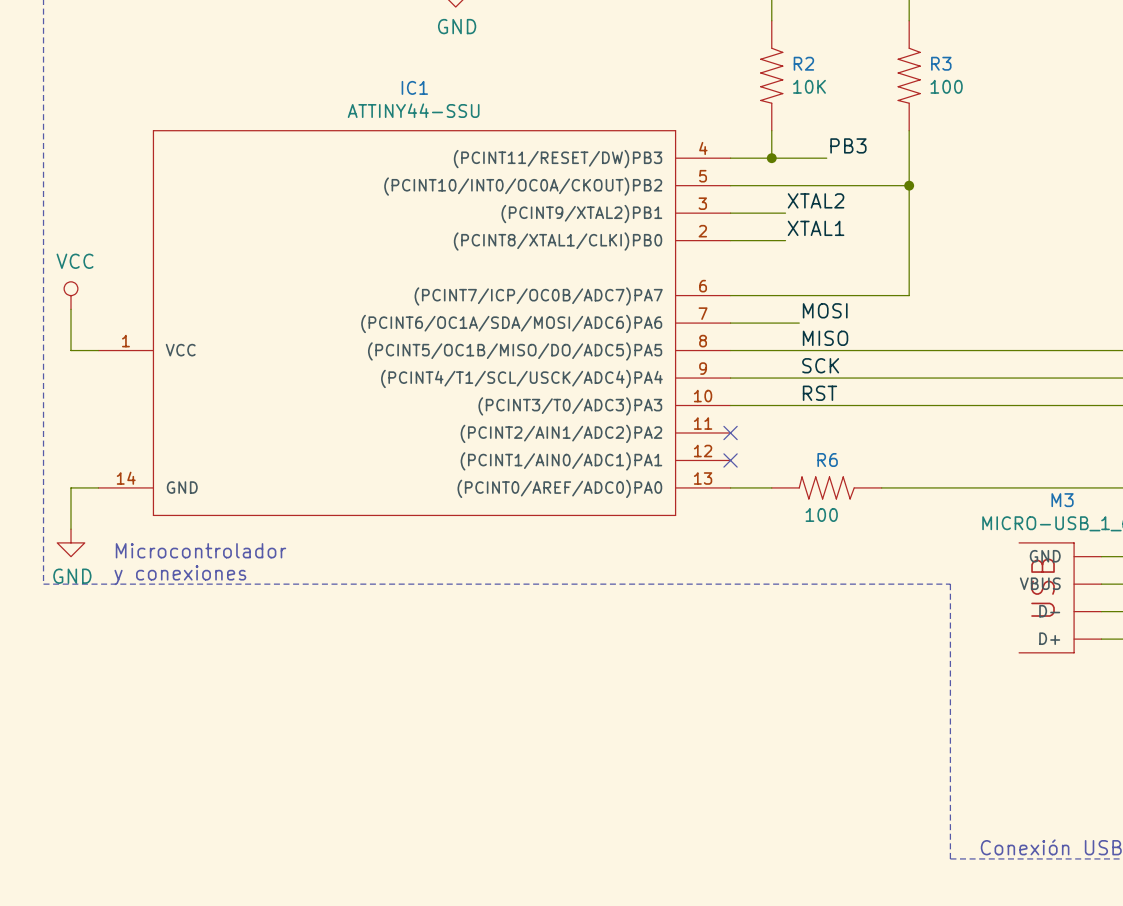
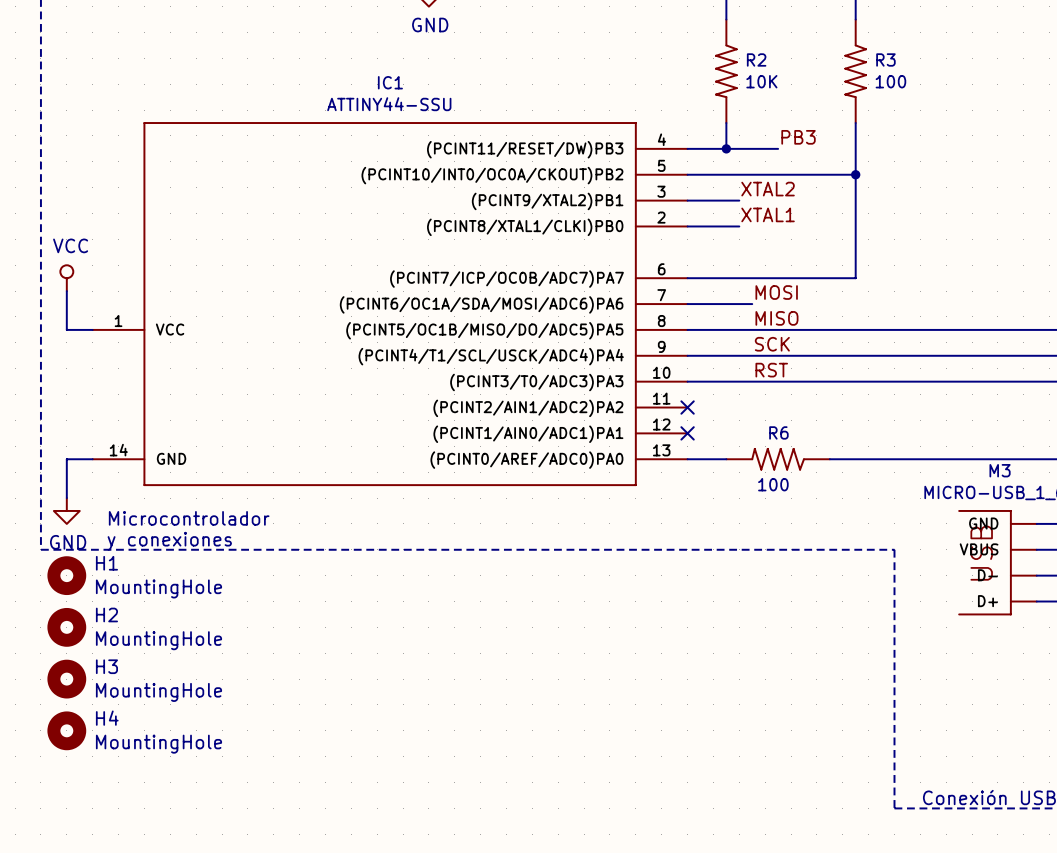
H1: none -> MountingHole (66, 575)
H2: none -> MountingHole (66, 627)
H3: none -> MountingHole (66, 679)
H4: none -> MountingHole (66, 730)

